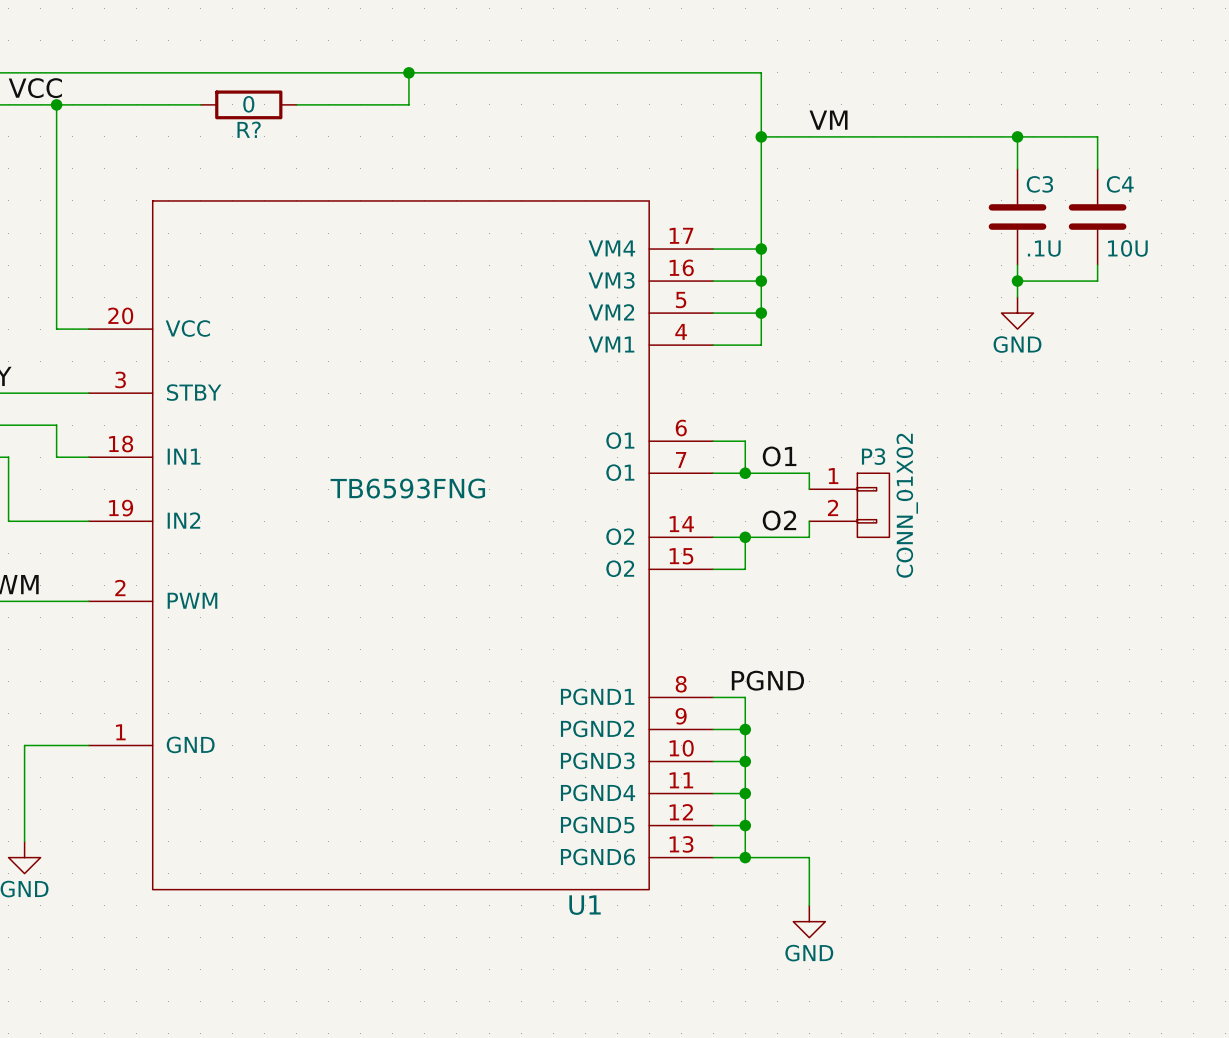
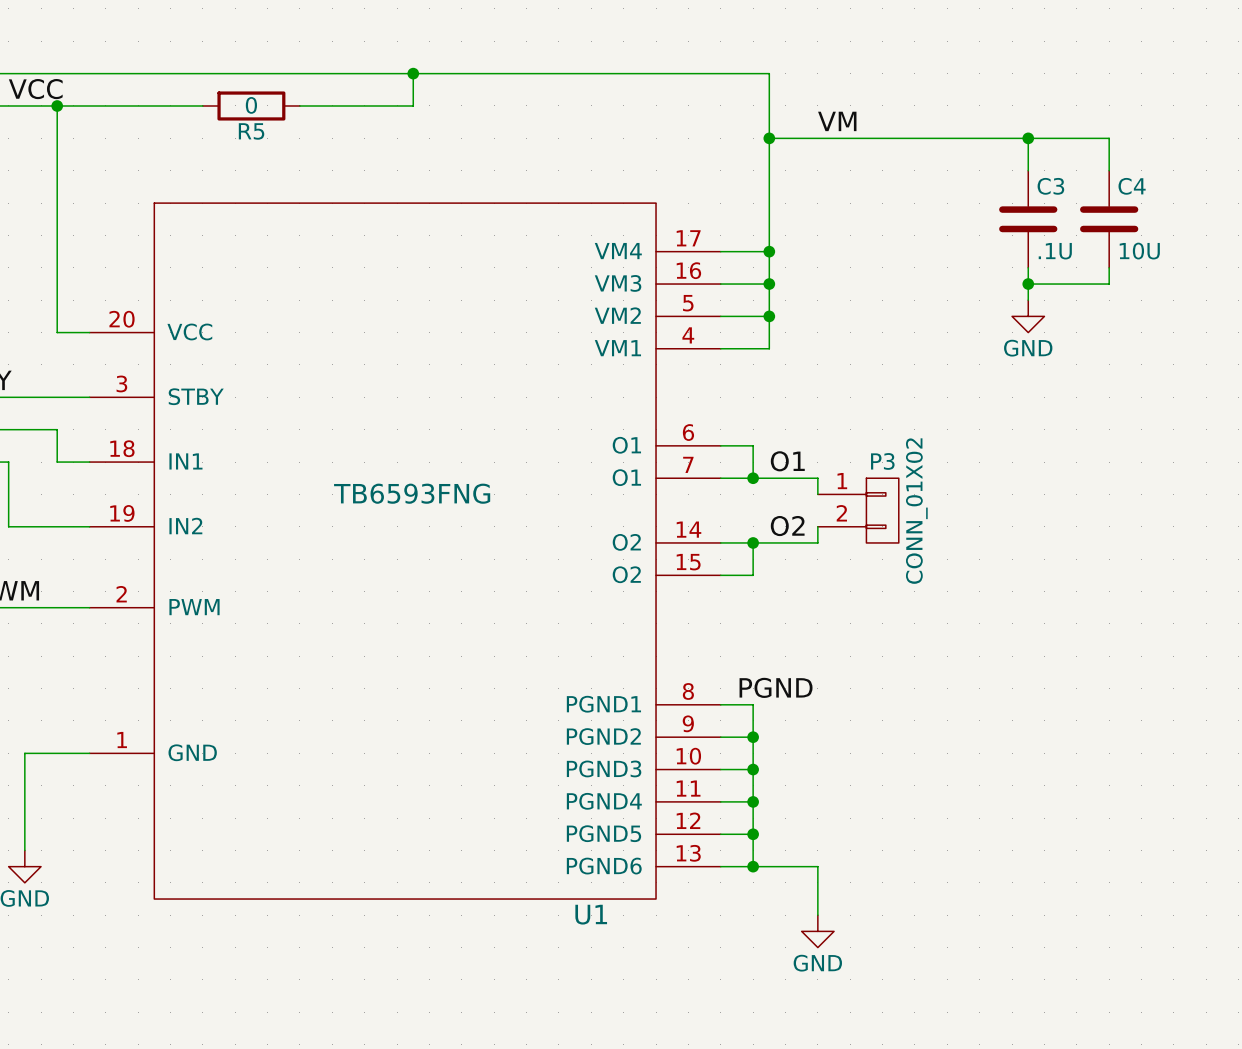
R? name: R? (249, 129) -> R5 (251, 131)

